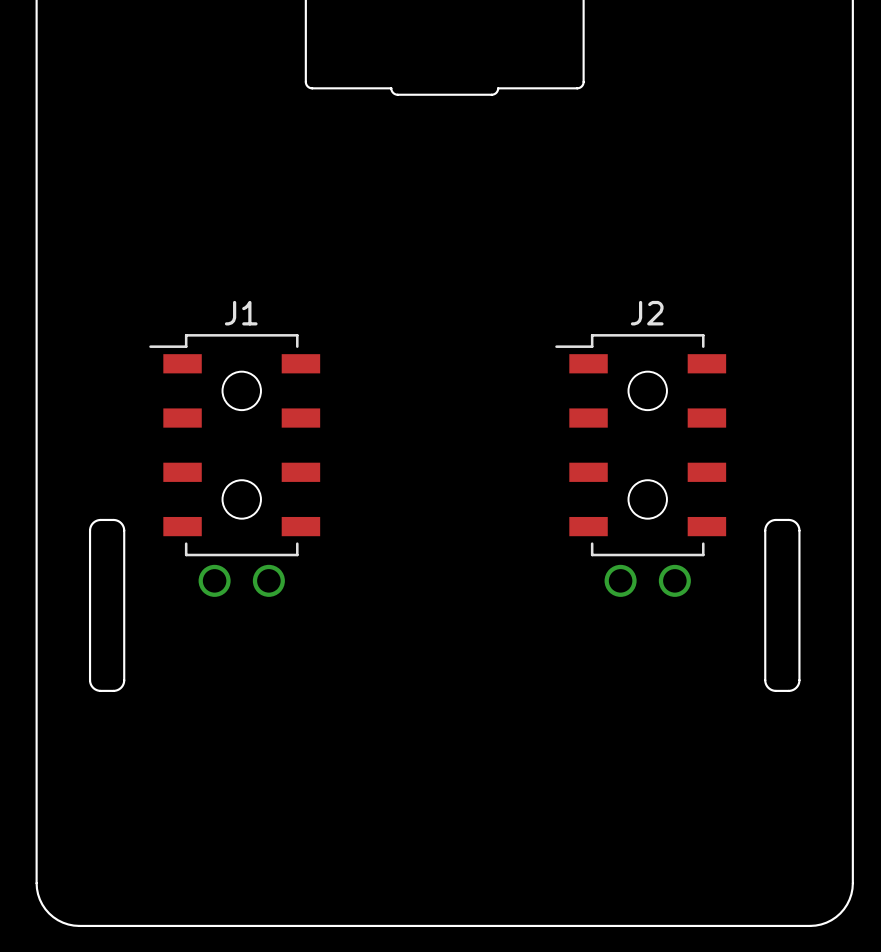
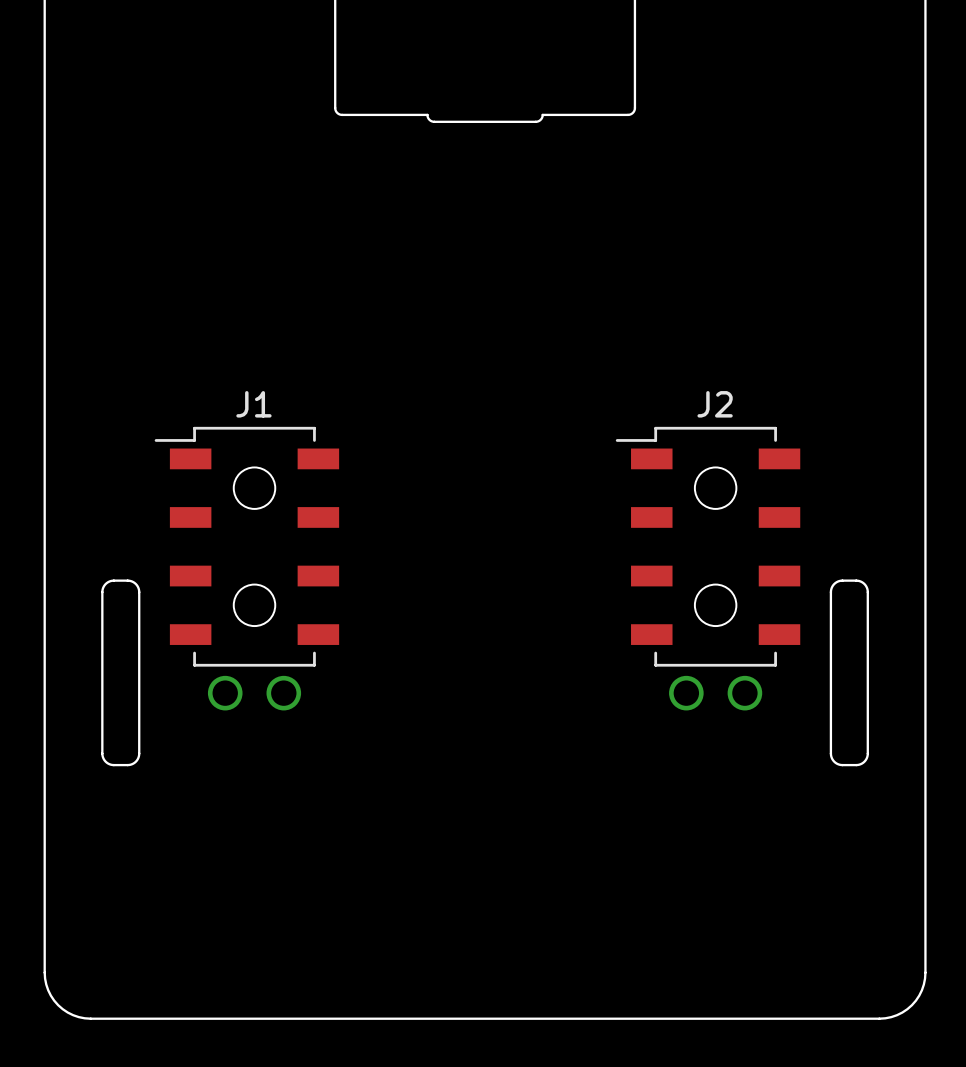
J1 position: (234, 465) -> (246, 568)
J2 position: (640, 465) -> (708, 568)

